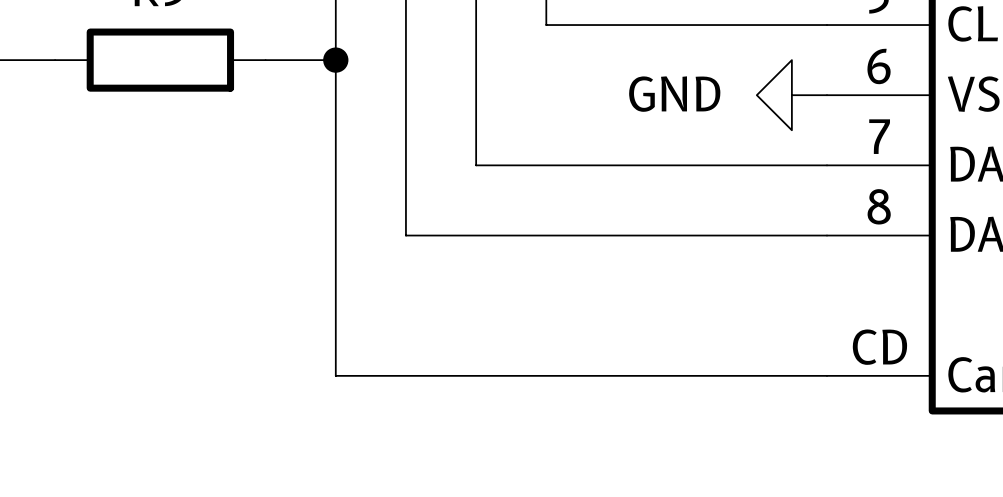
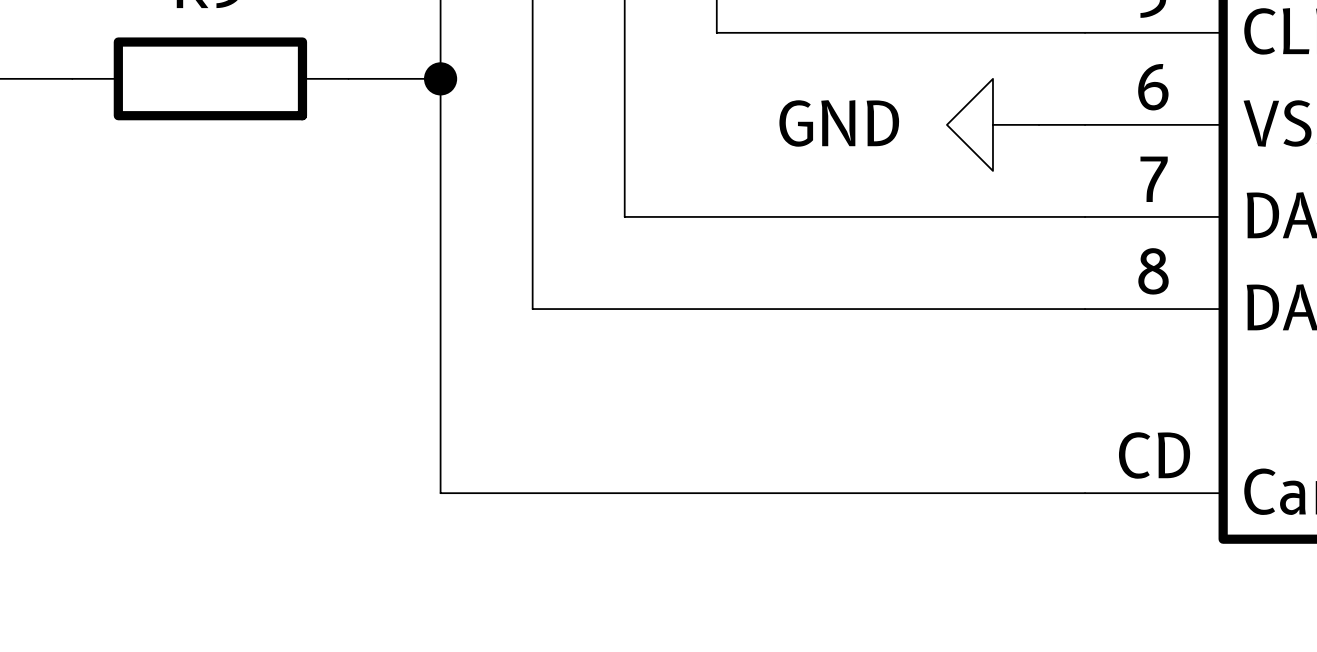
power symbol position: GND (791, 95) -> GND (992, 124)

